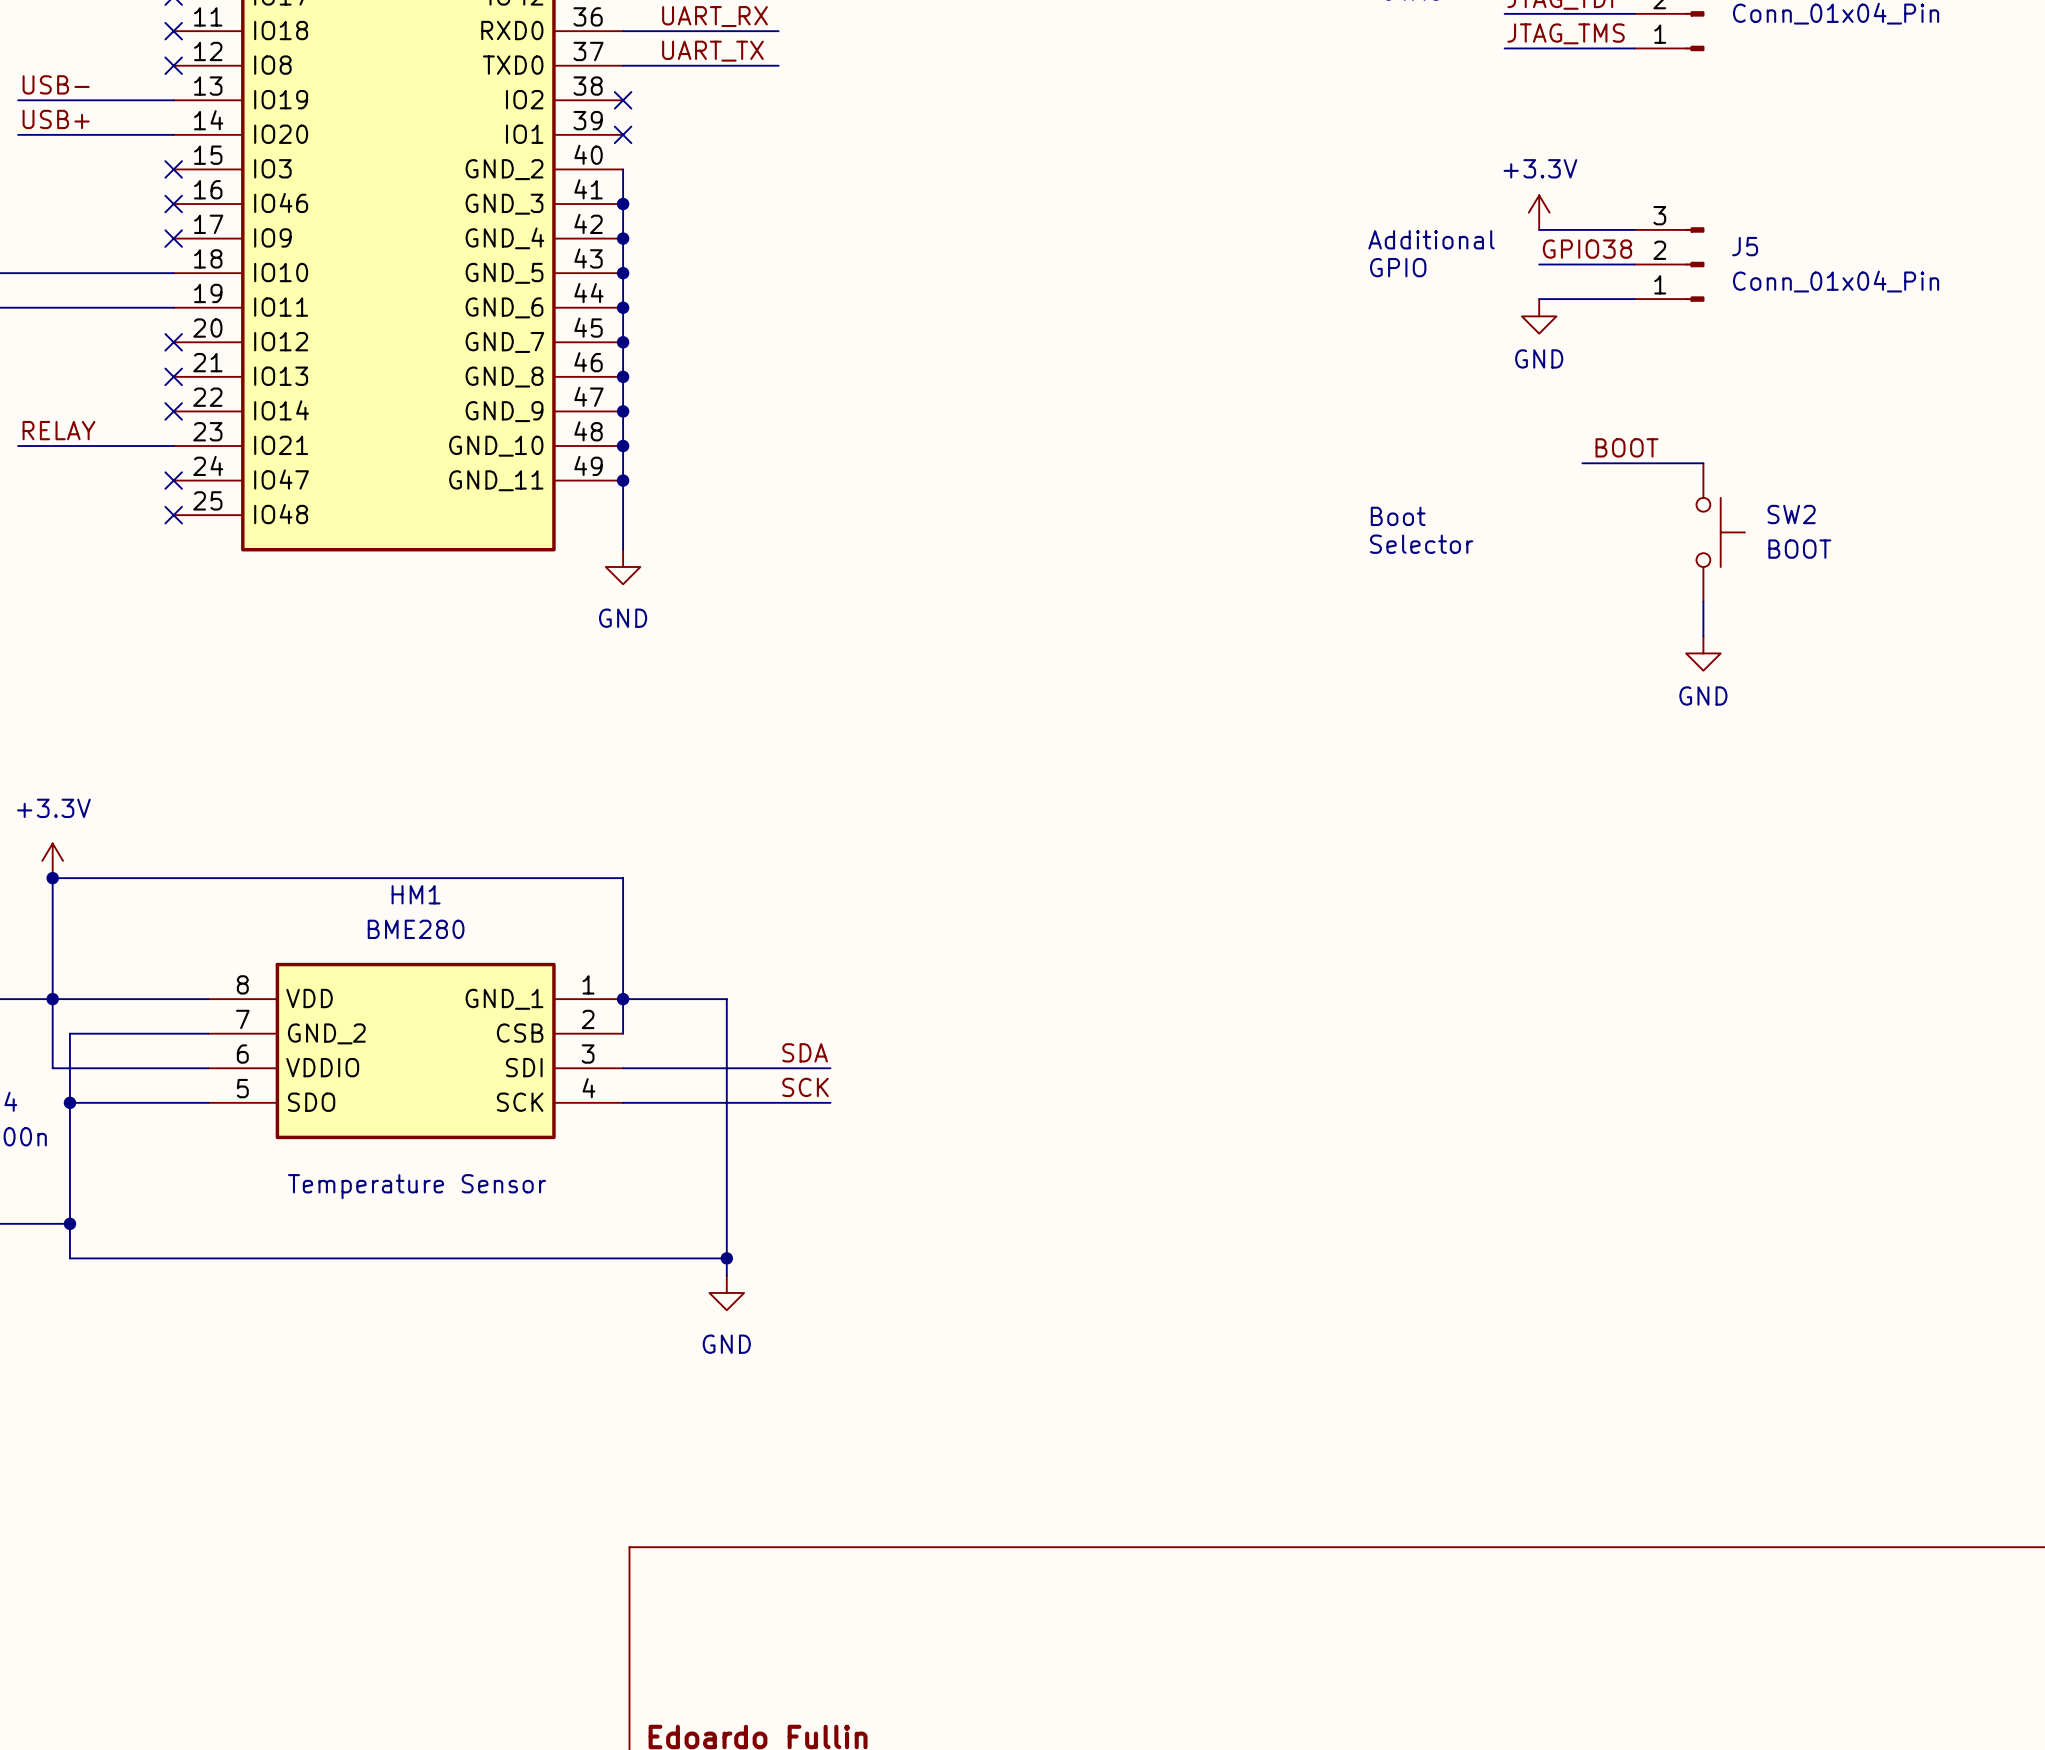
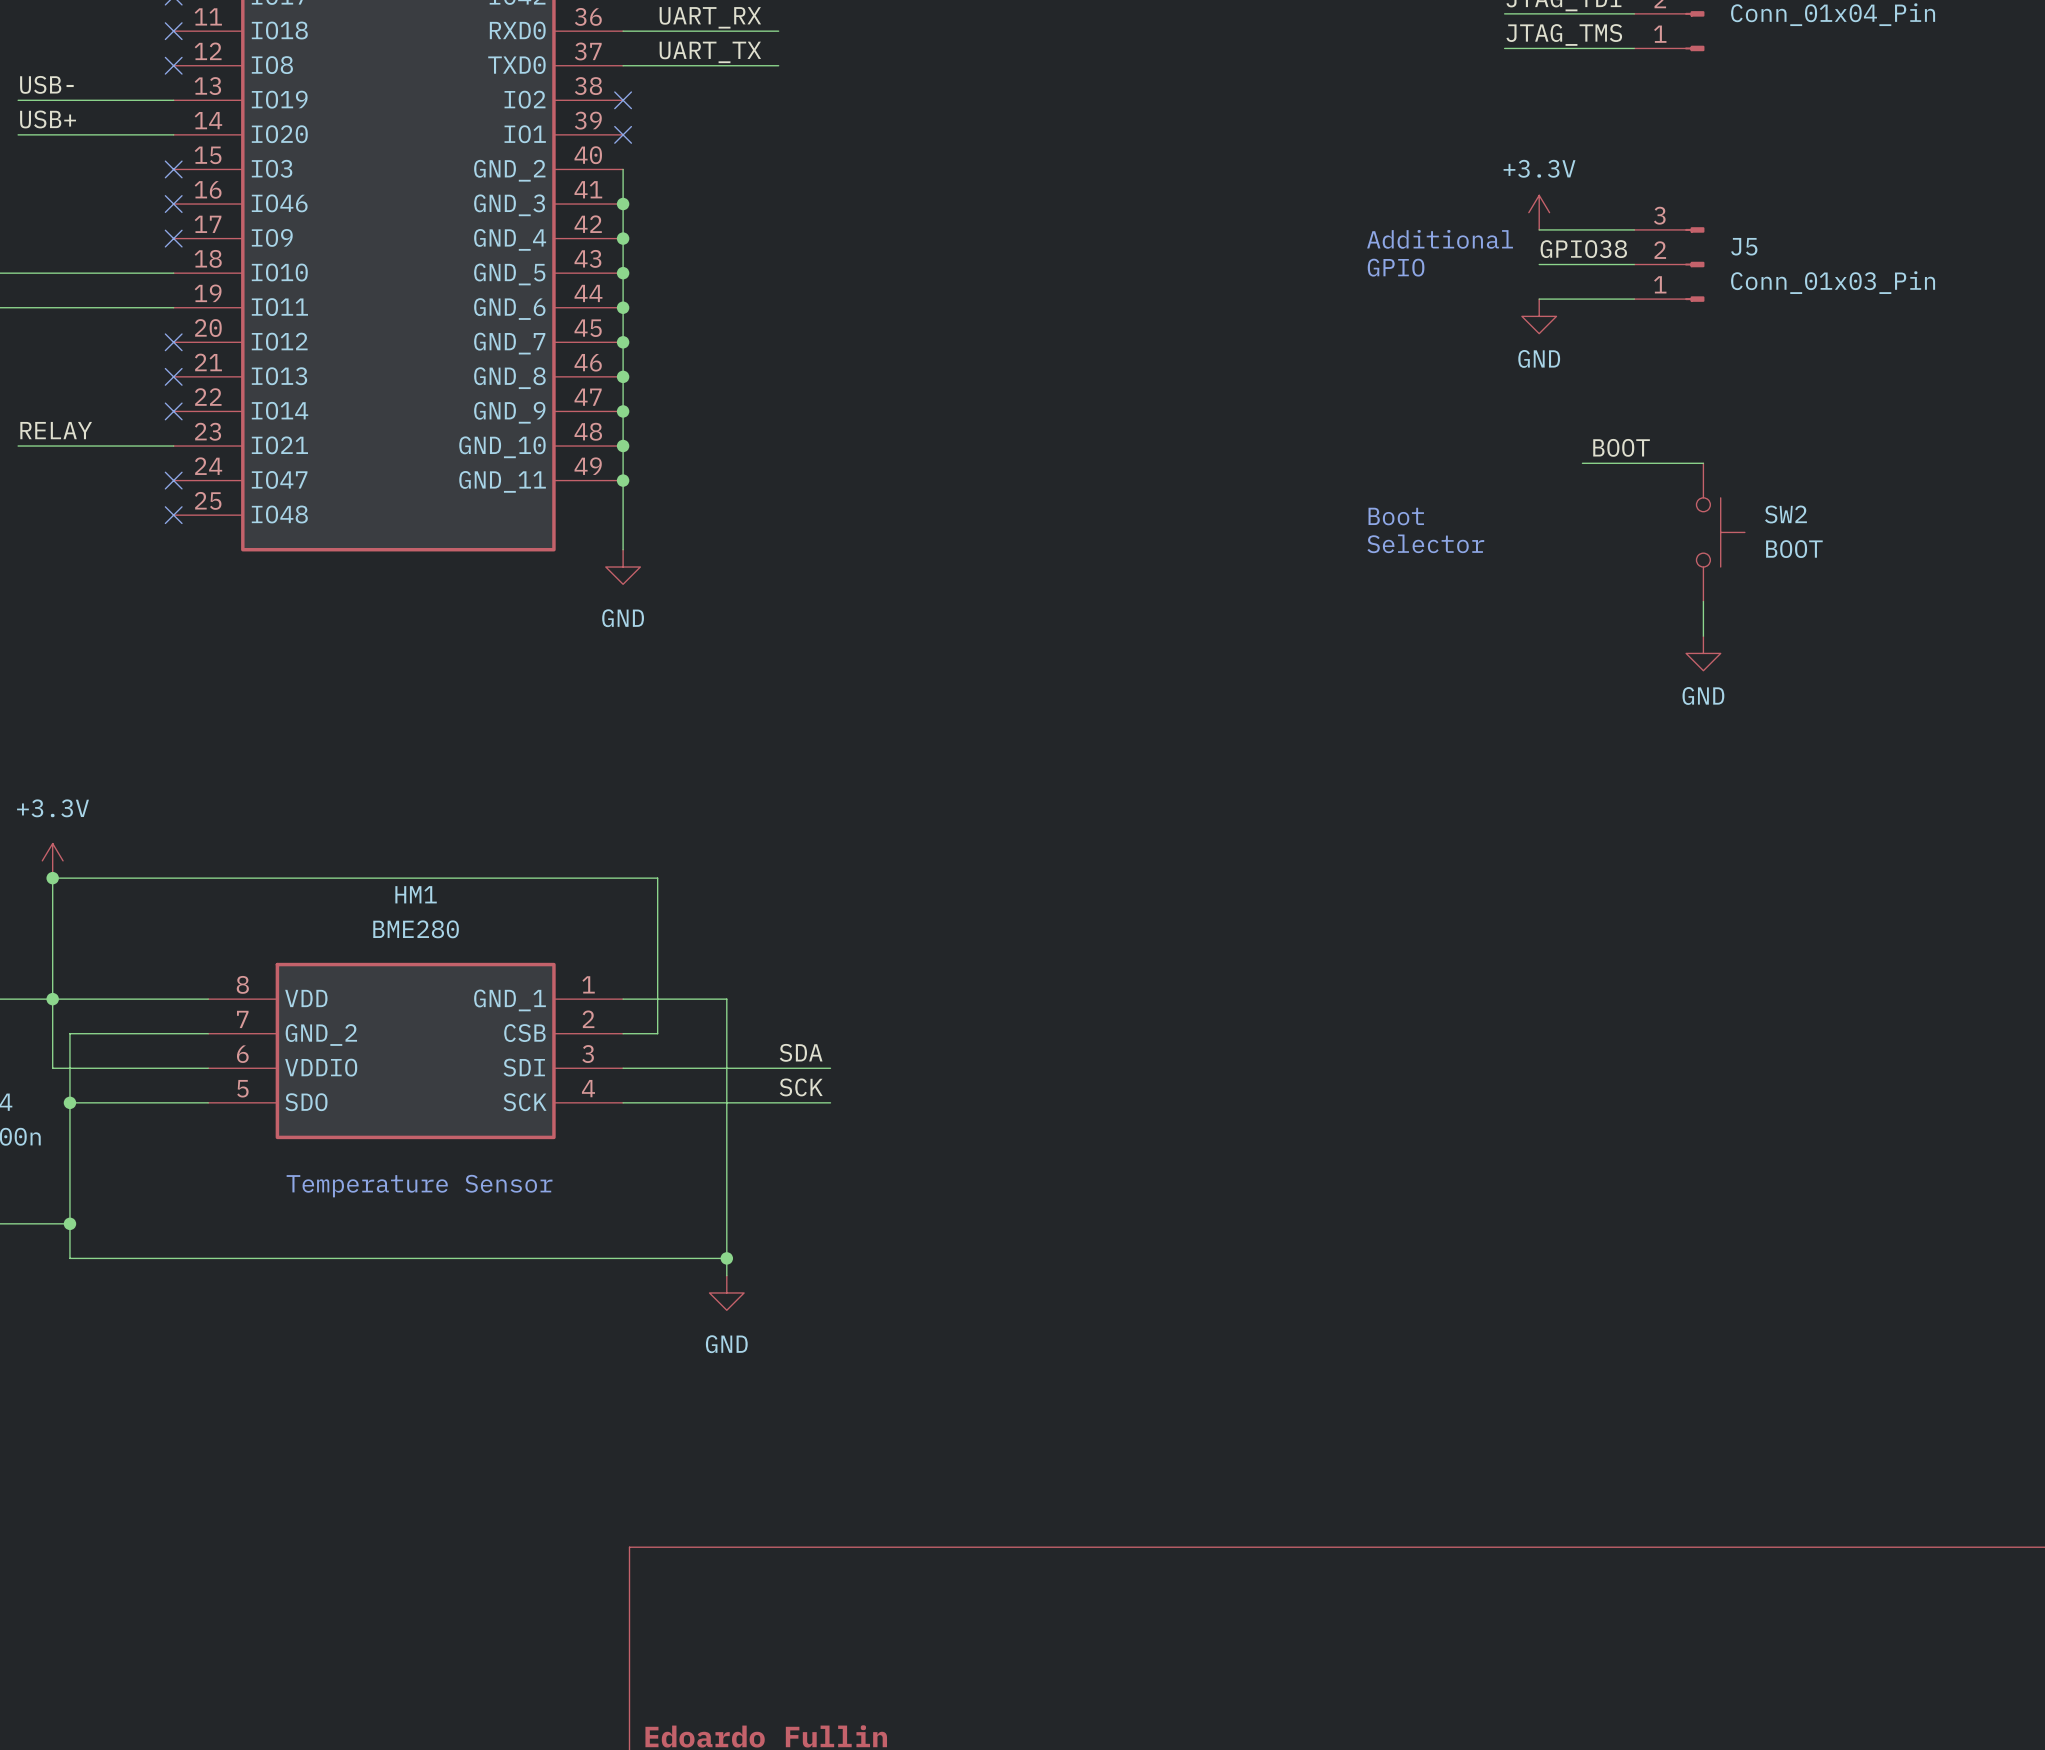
J5 value: Conn_01x04_Pin (1836, 281) -> Conn_01x03_Pin (1833, 282)
wire: (623, 878) (623, 1033) -> (623, 878) (657, 878) (657, 1033) (623, 1033)
junction: (623, 999) -> none

